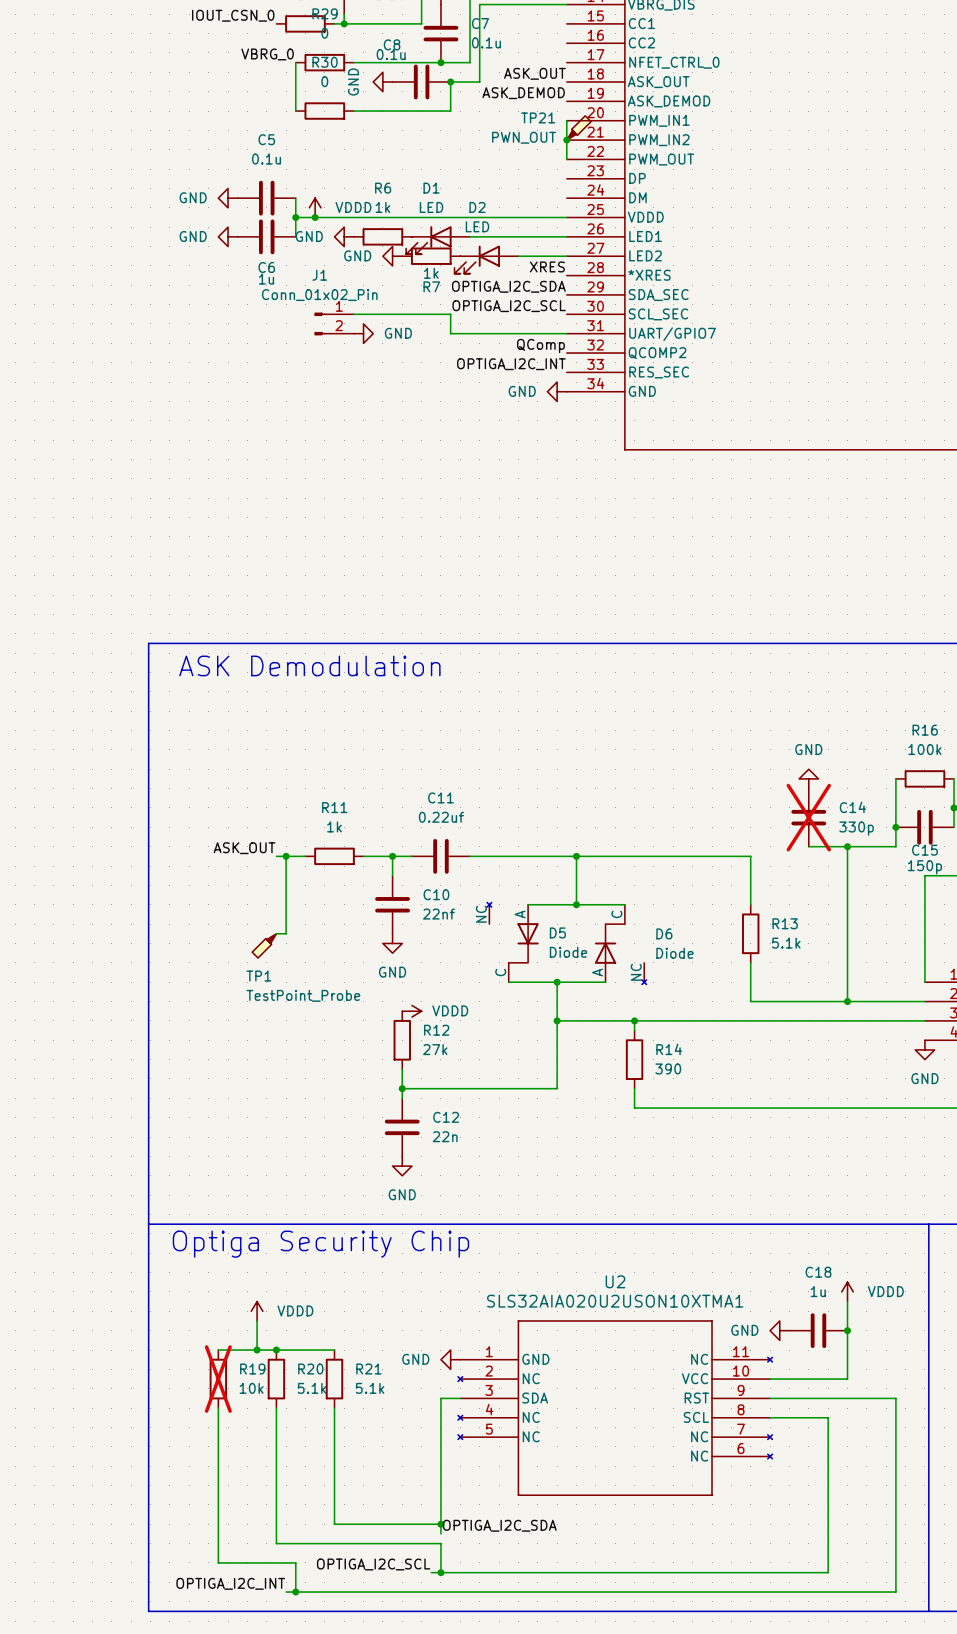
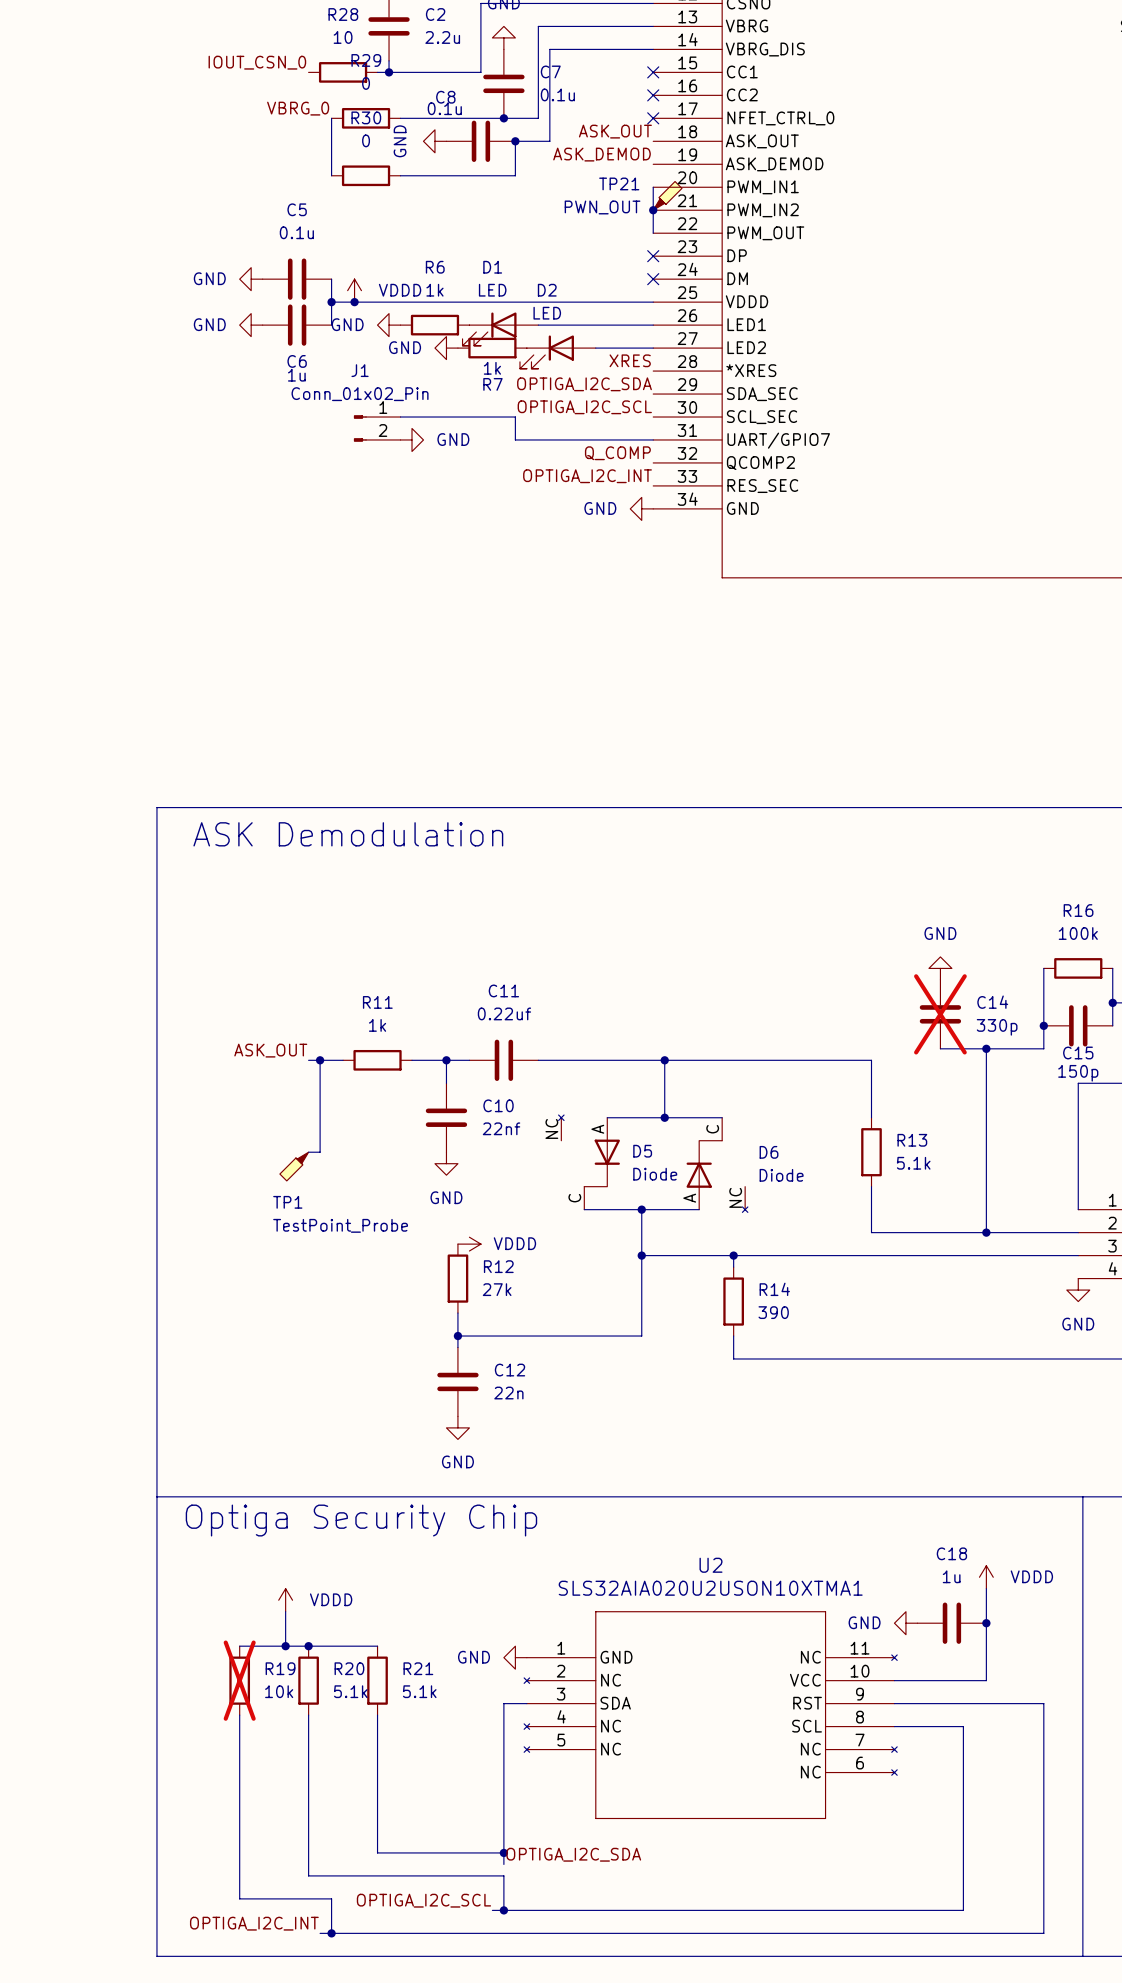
no-connect mark: none -> (653, 72)
no-connect mark: none -> (653, 95)
no-connect mark: none -> (653, 118)
no-connect mark: none -> (653, 256)
no-connect mark: none -> (653, 279)
label: QComp (540, 346) -> Q_COMP (617, 453)

